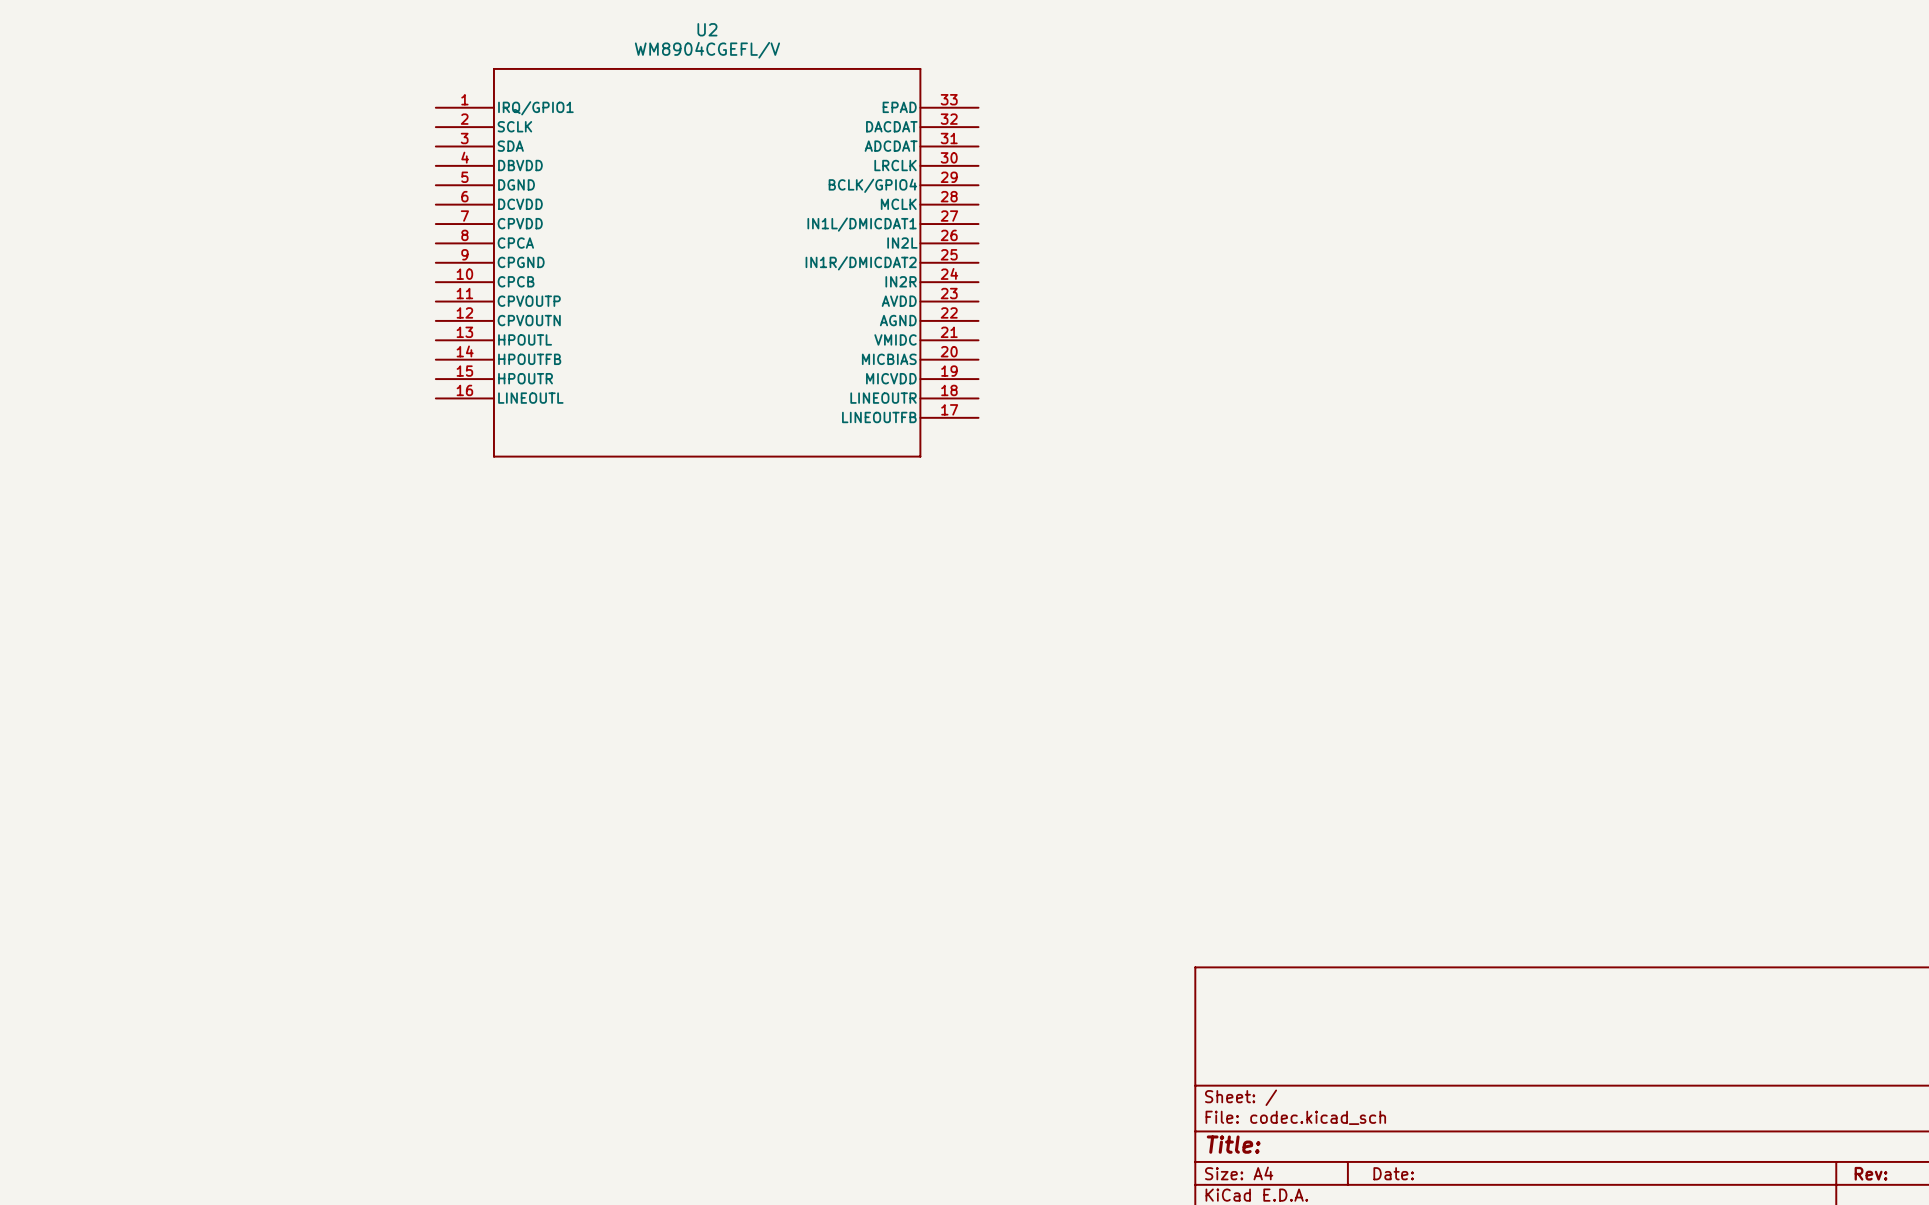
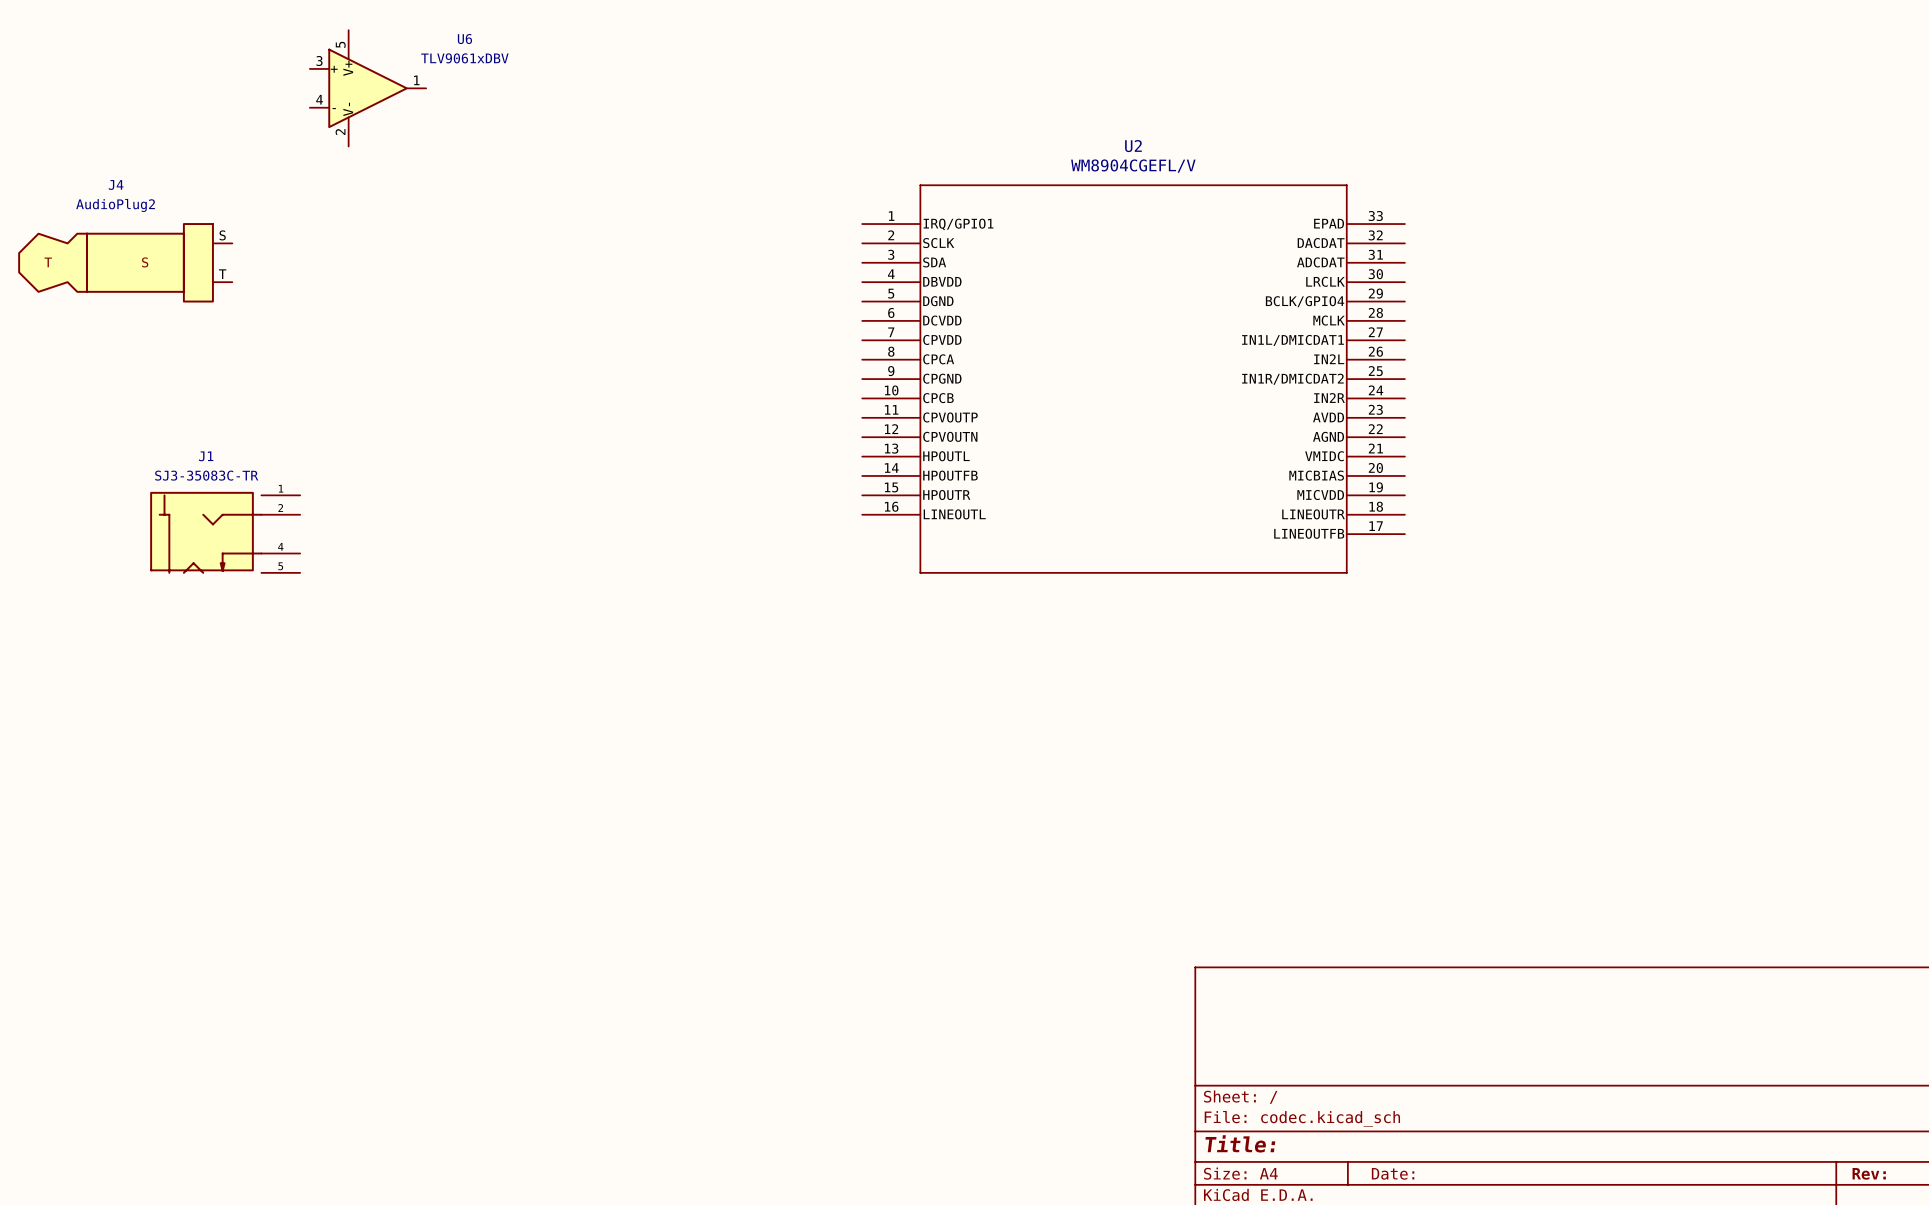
U6: none -> TLV9061xDBV (368, 88)
J4: none -> AudioPlug2 (125, 262)
U2 position: (707, 262) -> (1133, 379)
J1: none -> SJ3-35083C-TR (225, 532)

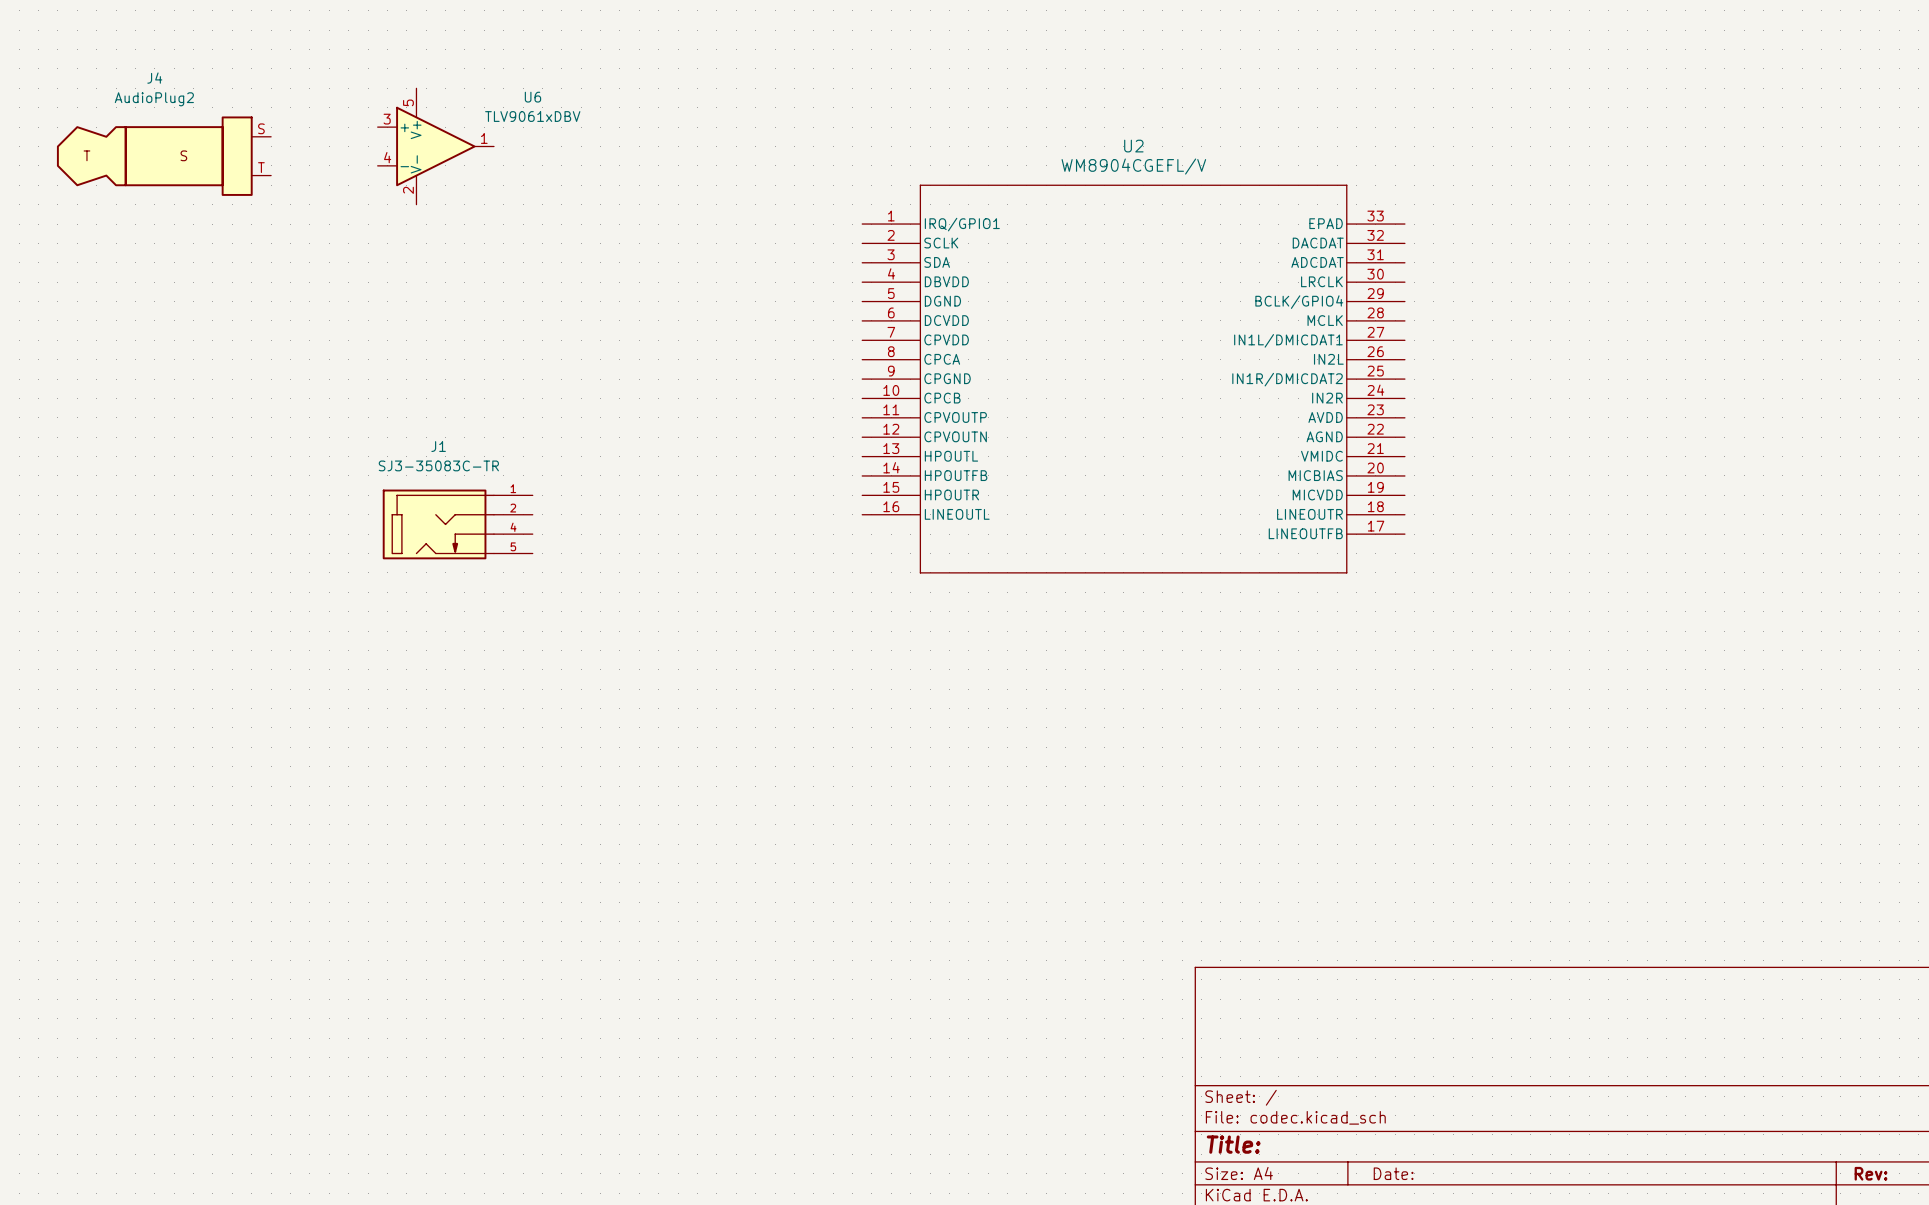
U6 position: (368, 88) -> (435, 146)
J4 position: (125, 262) -> (164, 156)
J1 symbol: [150, 491, 301, 574] -> [382, 489, 533, 560]

